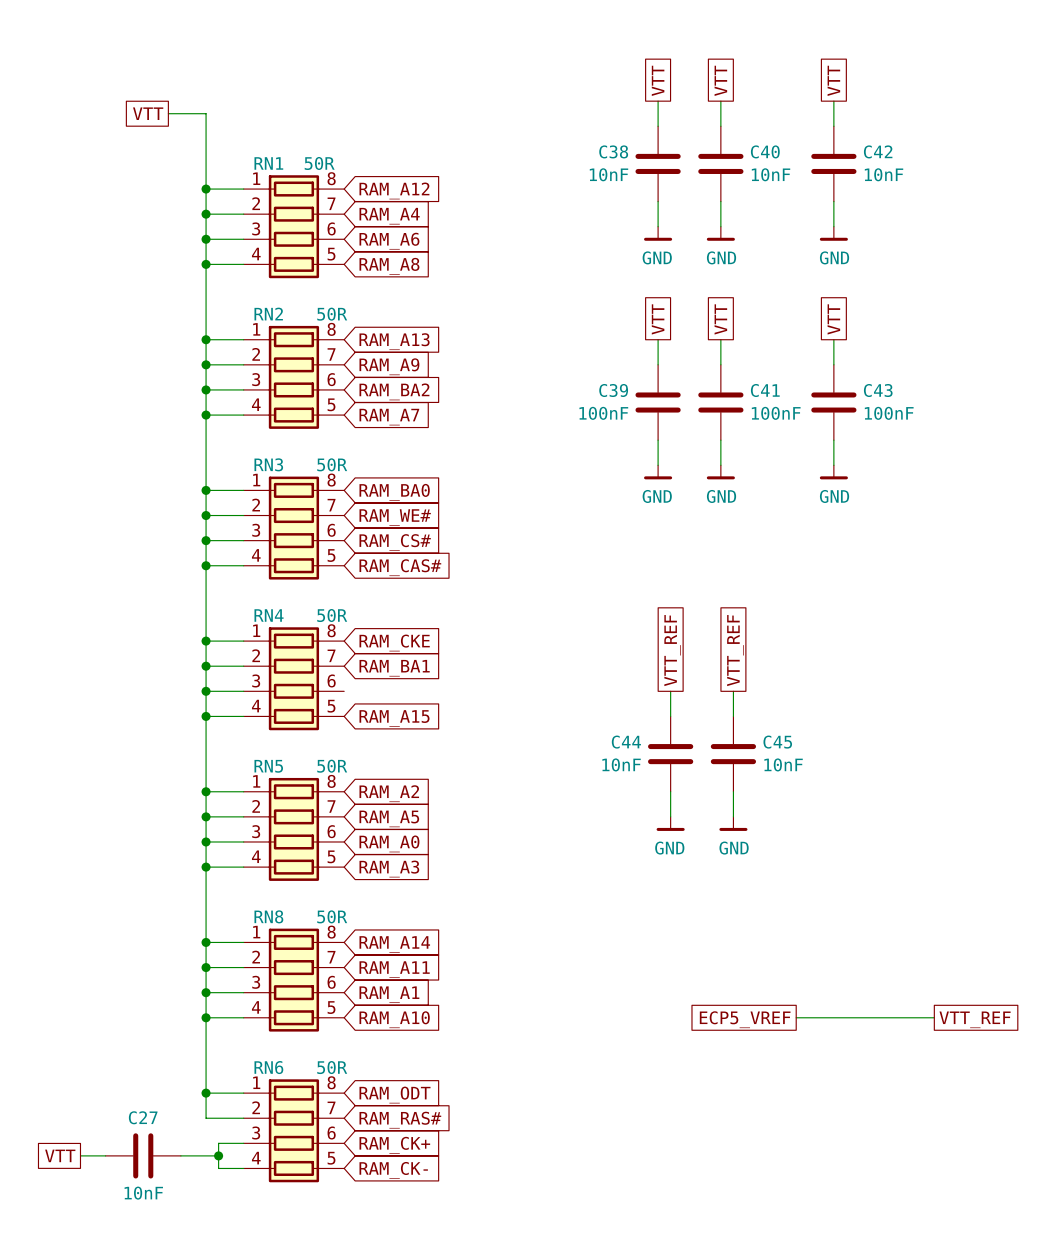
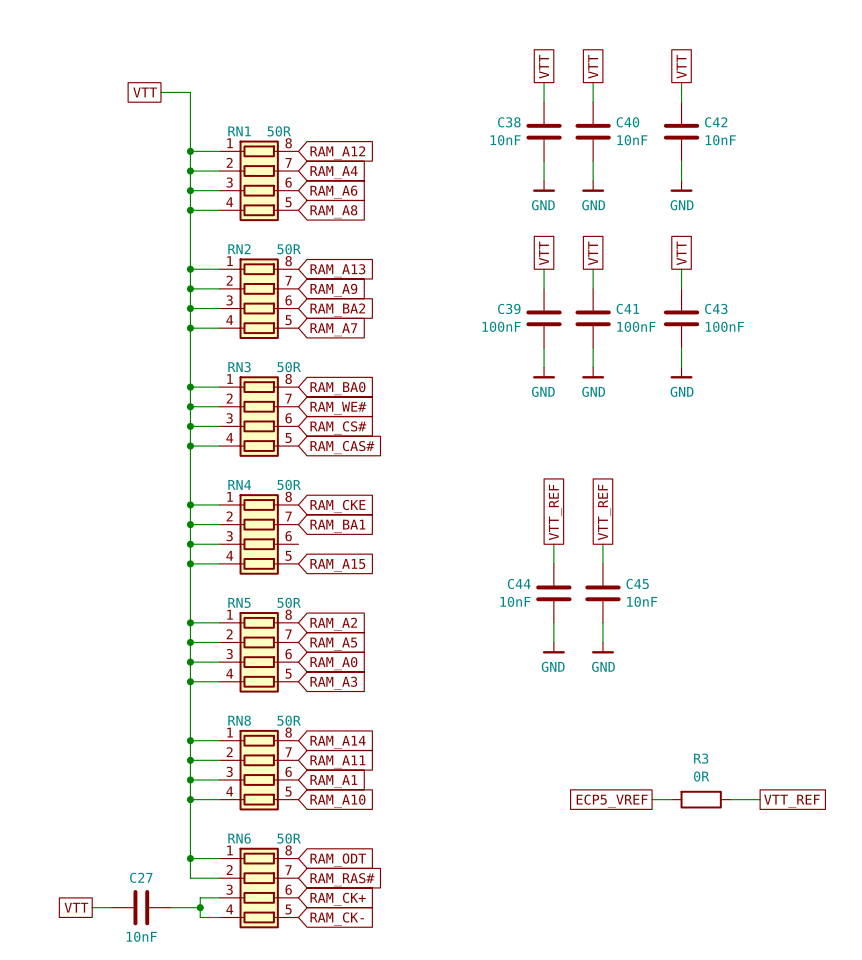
wire: (821, 1017) (896, 1017) -> none
R3: none -> 0R (701, 799)

